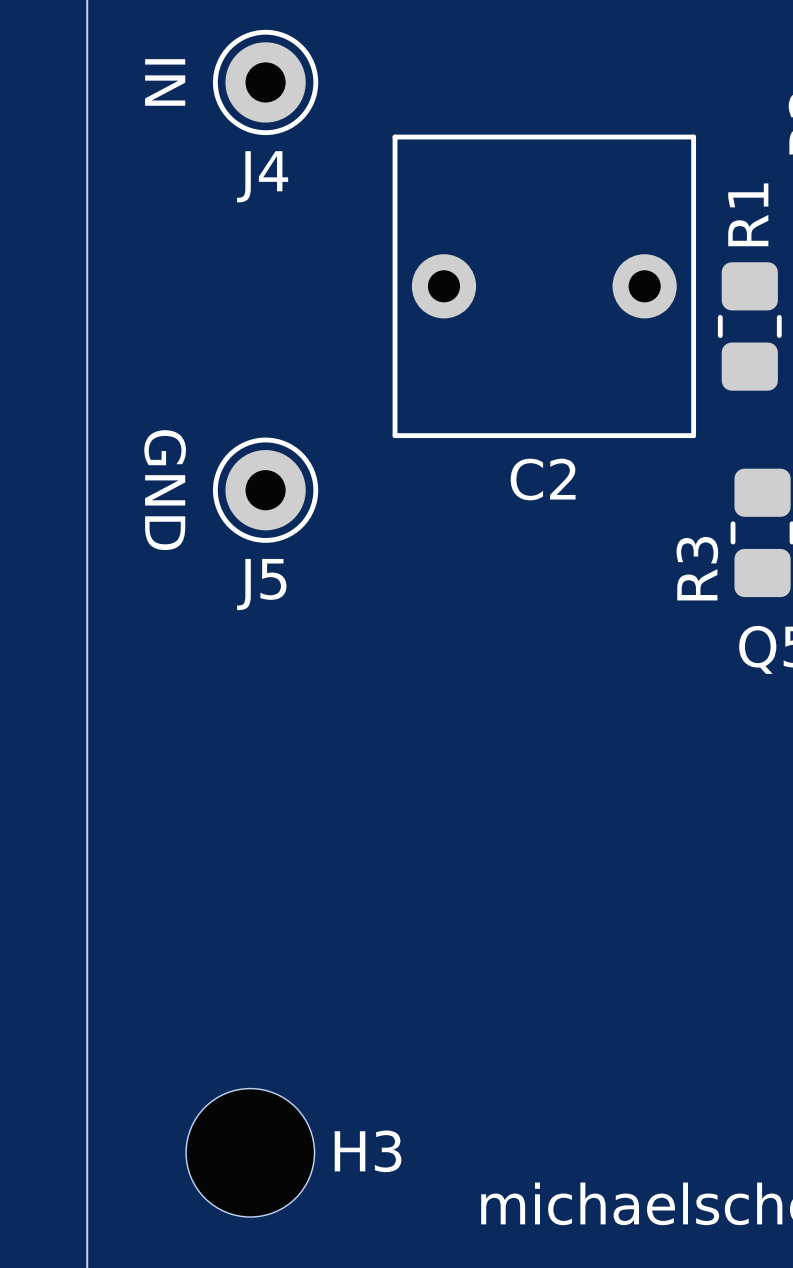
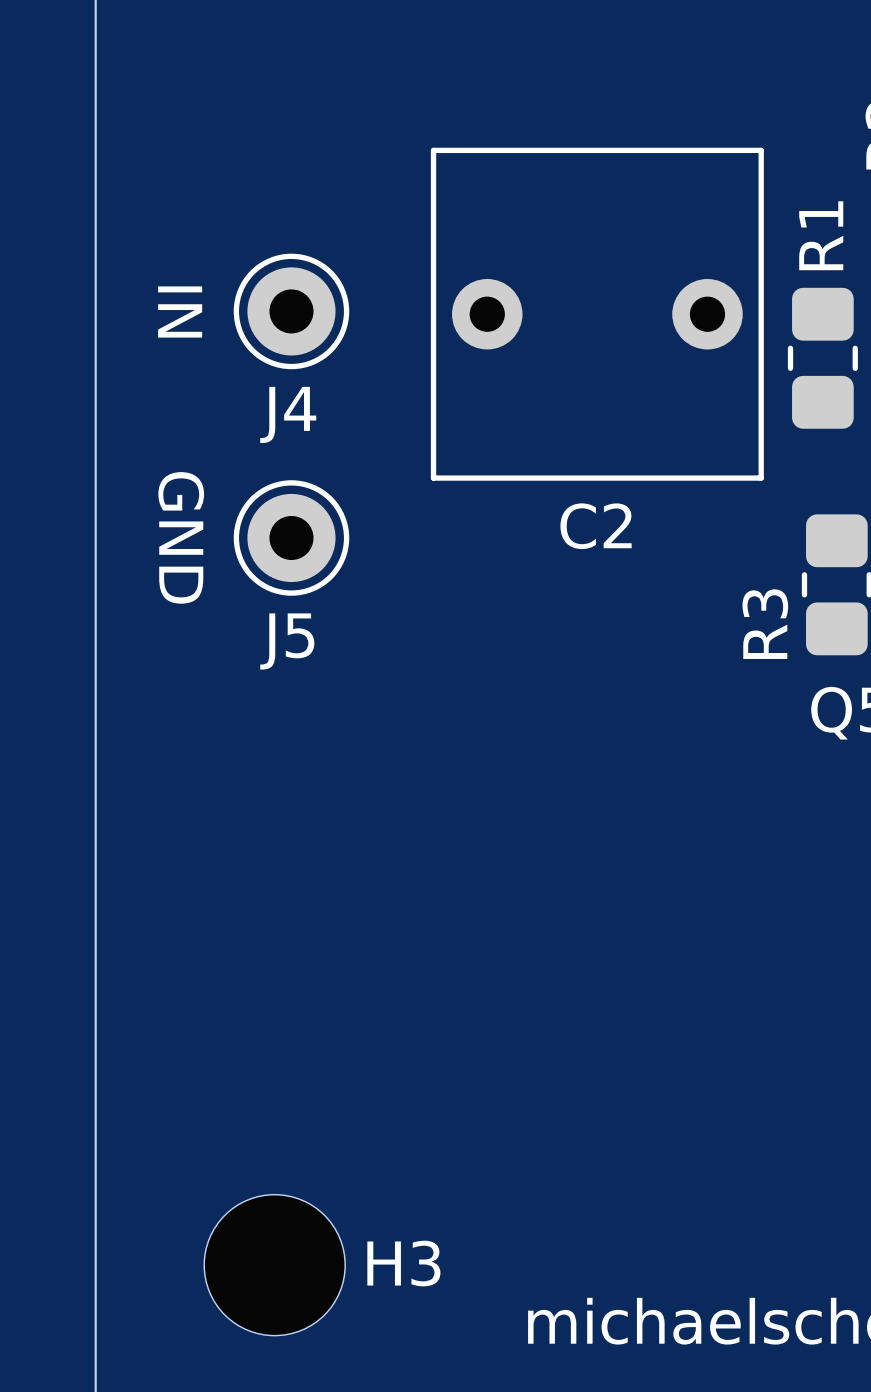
text position: IN (165, 82) -> IN (180, 311)
J4 position: (265, 82) -> (291, 311)

